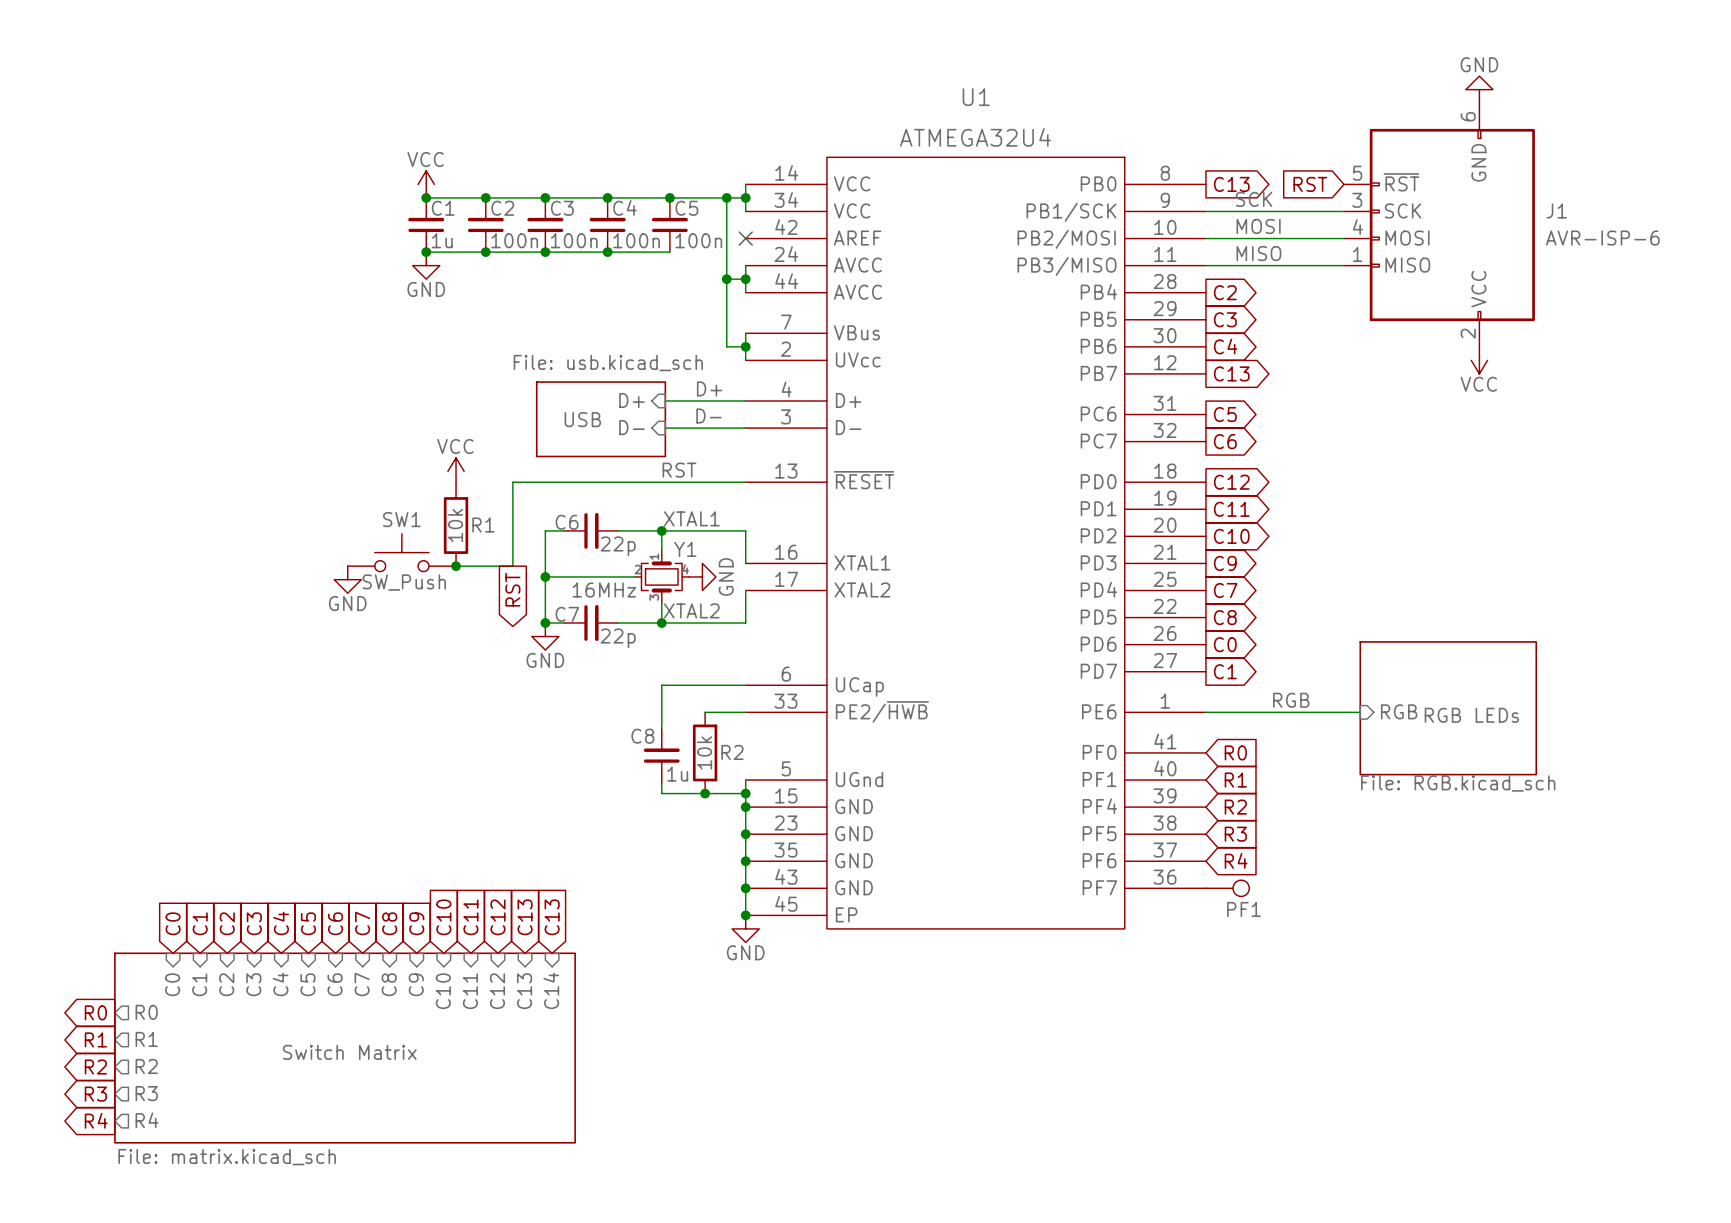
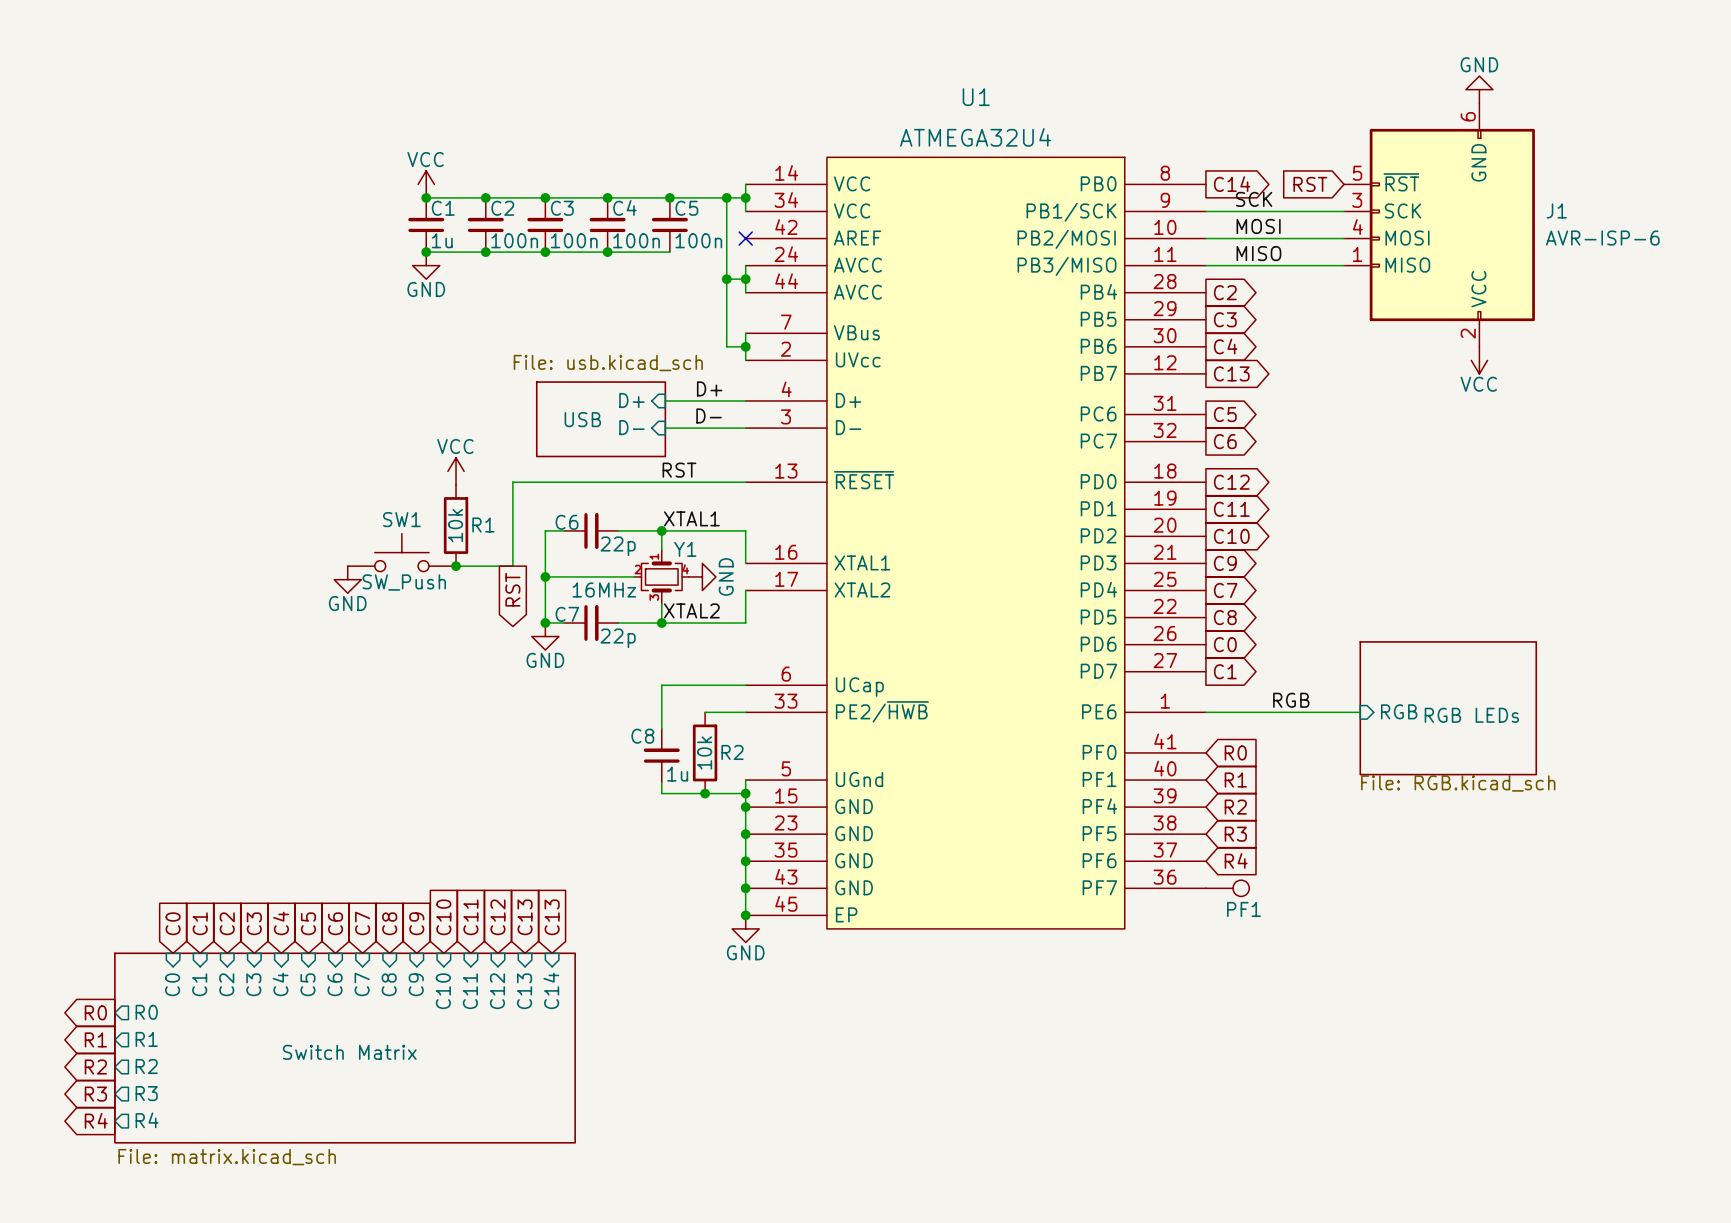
global label: C13 (1231, 184) -> C14 (1232, 184)

